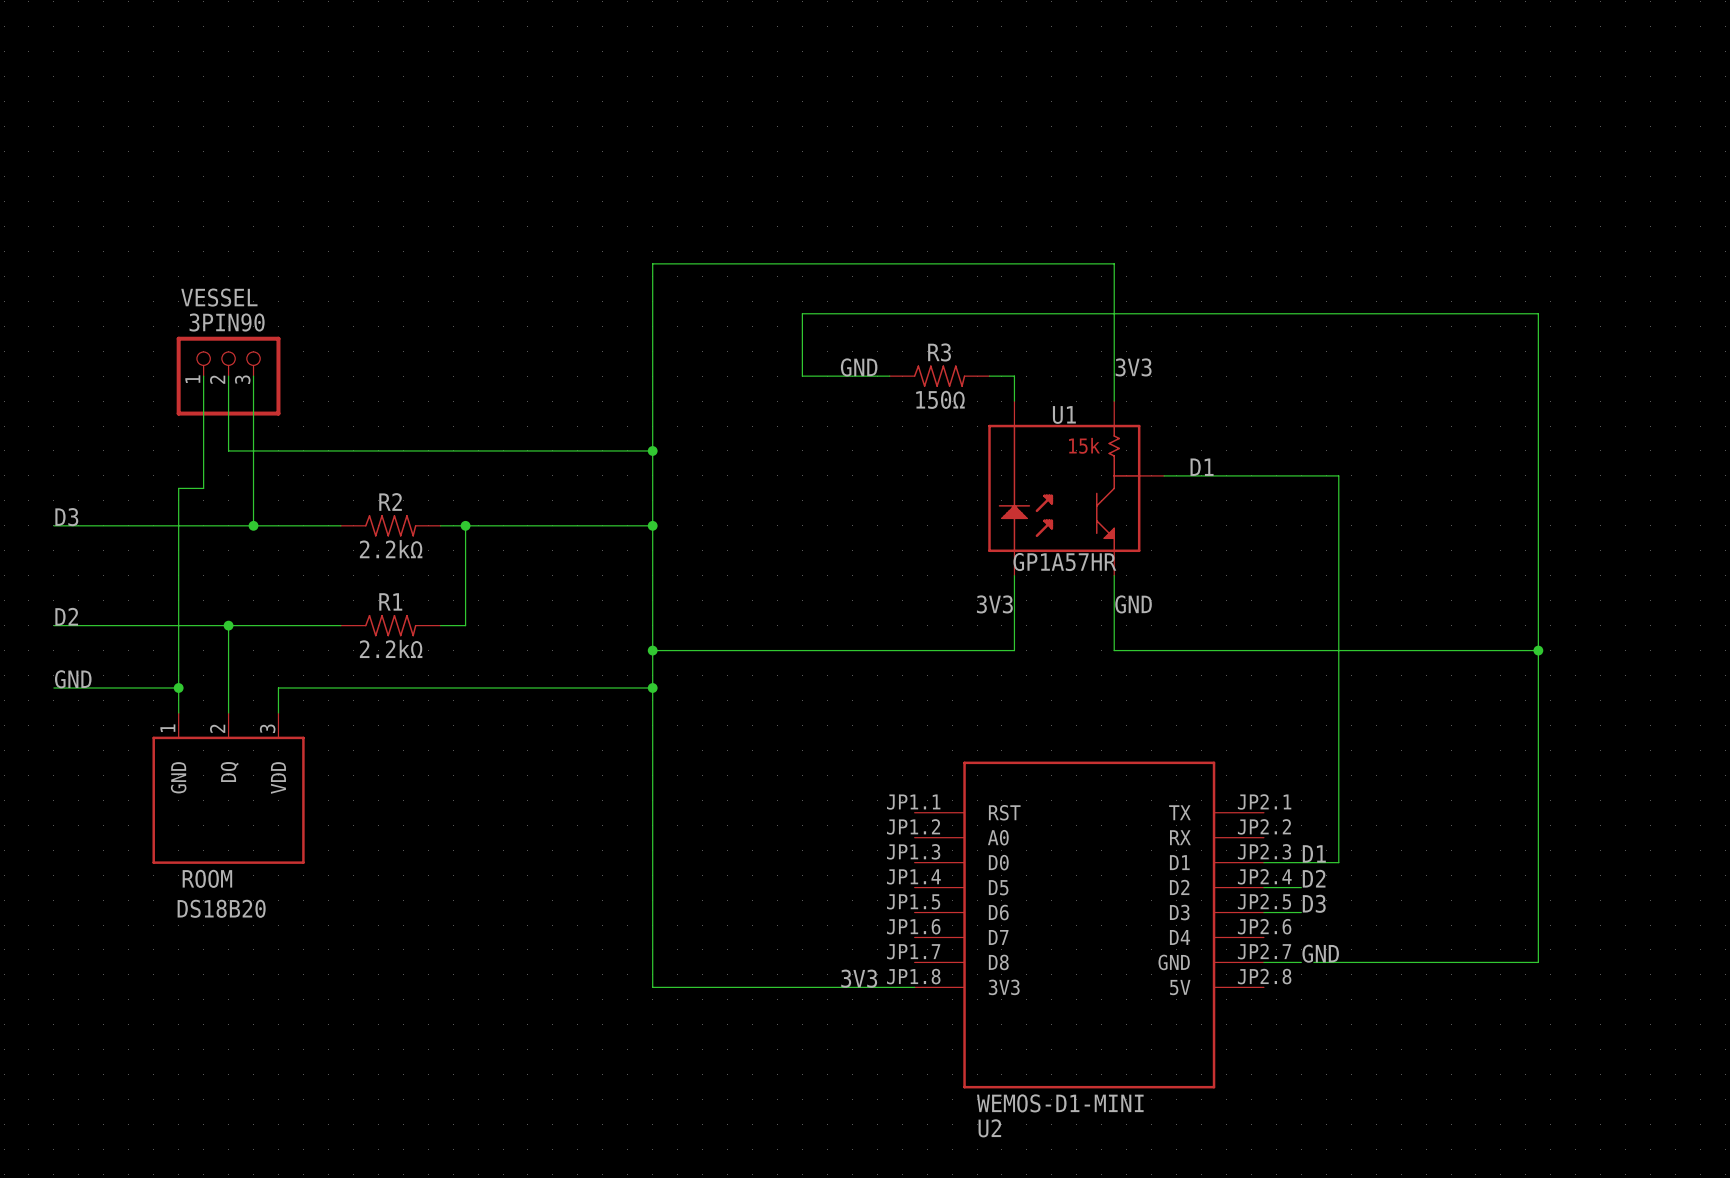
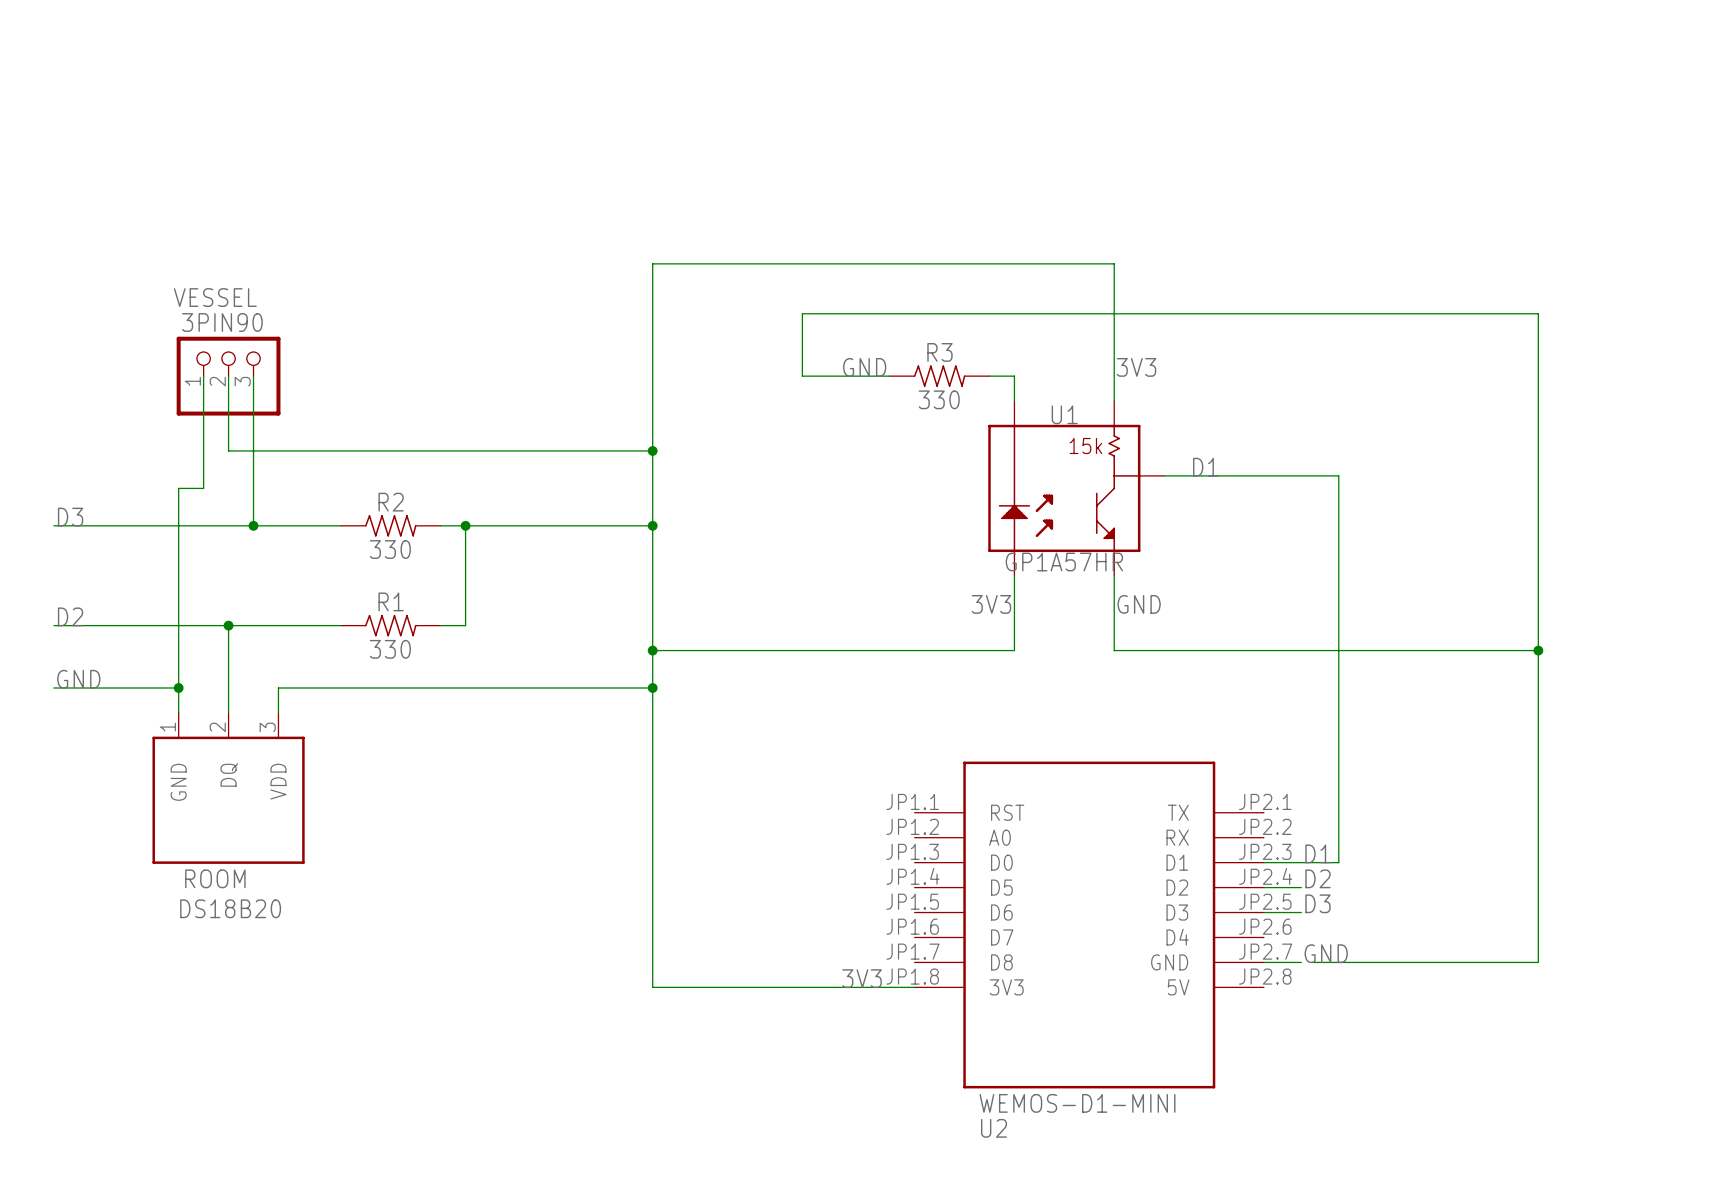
R3 value: 150Ω (940, 399) -> 330 (939, 399)
R2 value: 2.2kΩ (391, 549) -> 330 (390, 549)
R1 value: 2.2kΩ (391, 648) -> 330 (390, 649)

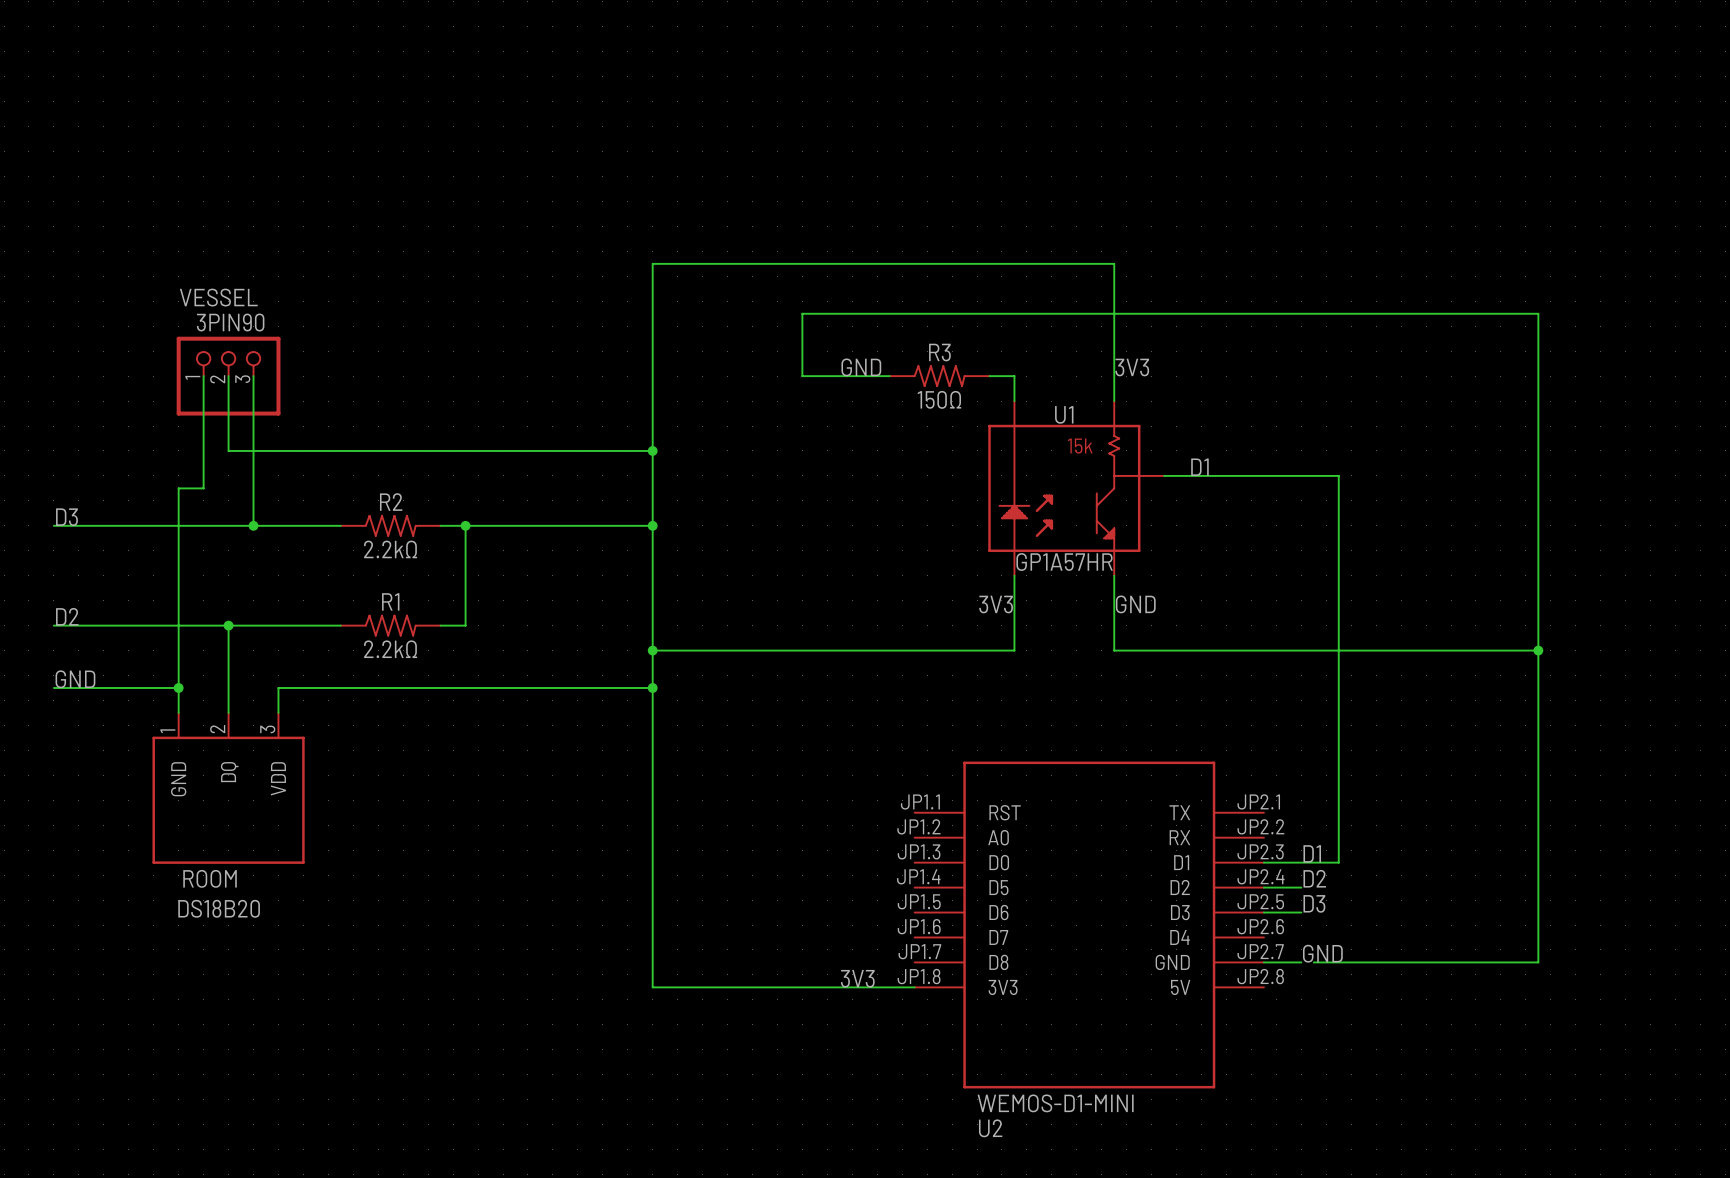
R3 value: 330 (939, 399) -> 150Ω (939, 399)
R2 value: 330 (390, 549) -> 2.2kΩ (390, 549)
R1 value: 330 (390, 649) -> 2.2kΩ (390, 649)

